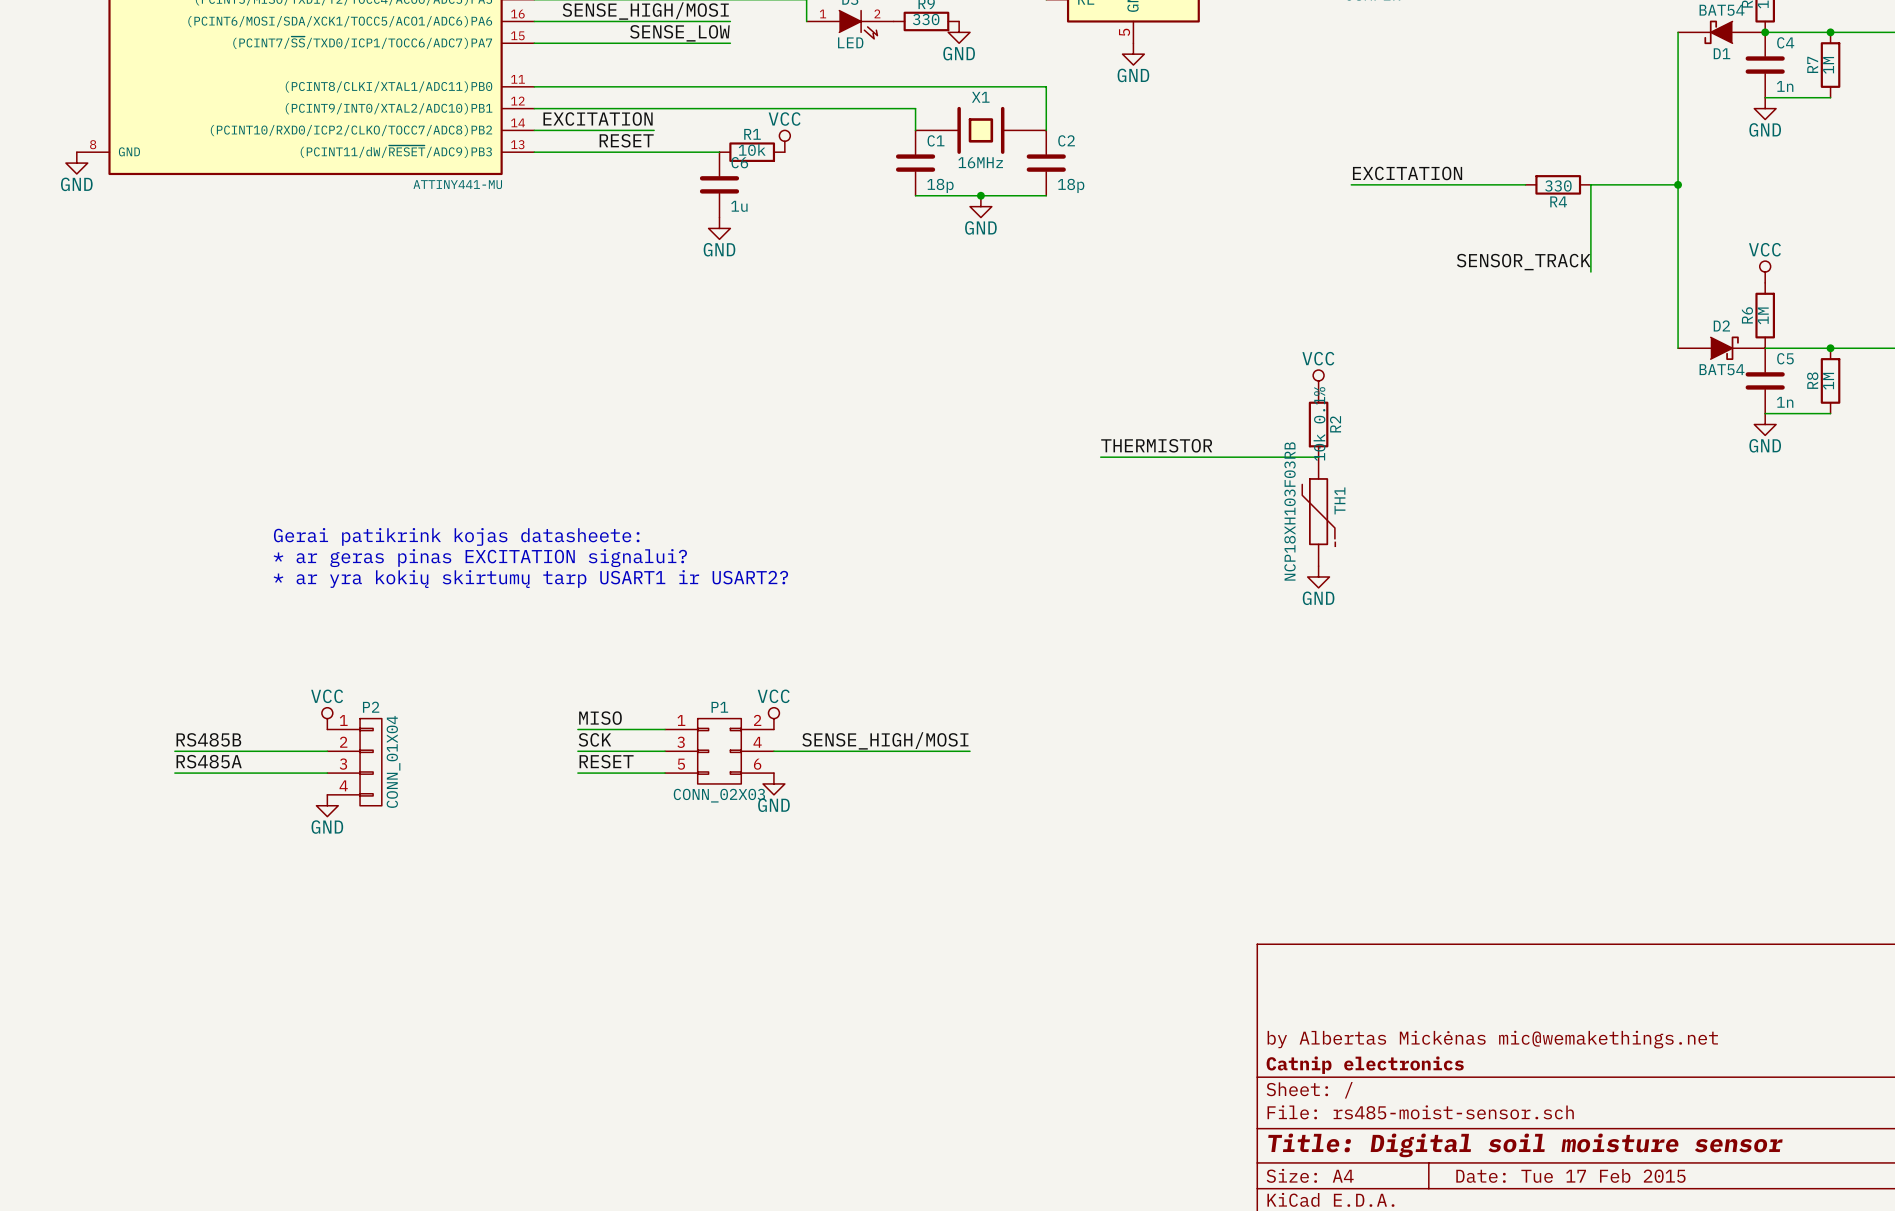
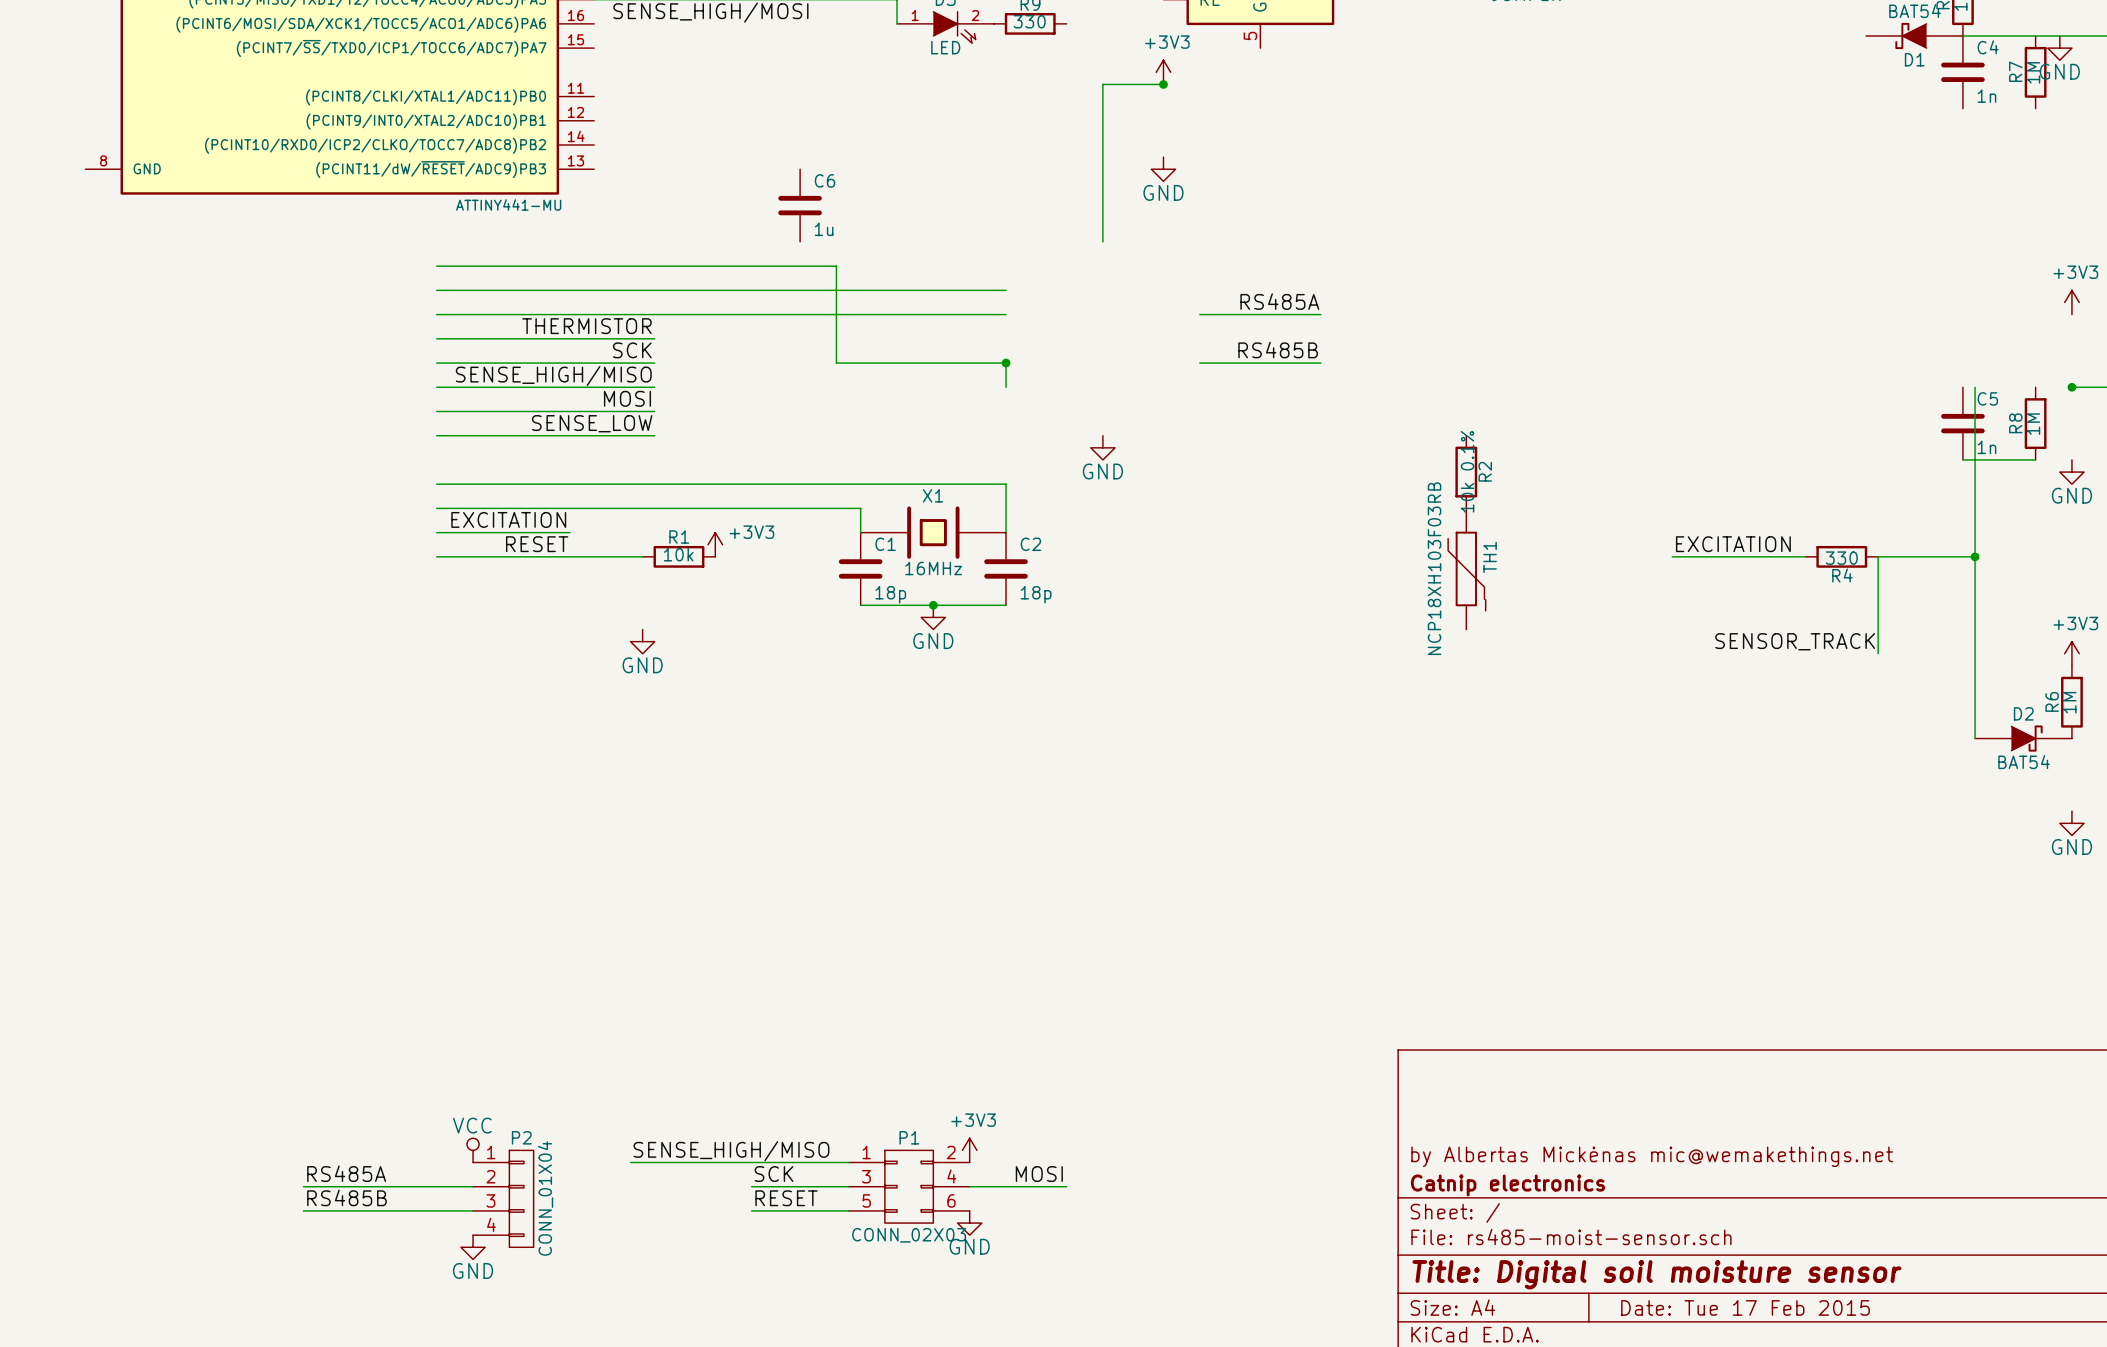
wire: (534, 21) (730, 21) -> none
power symbol: GND (959, 32) -> none
wire: (1678, 32) (1678, 348) -> none
junction: (1765, 32) -> none
junction: (1830, 32) -> none
label: SENSE_LOW (679, 33) -> none
wire: (534, 43) (730, 43) -> none
power symbol: GND (1133, 54) -> none
power symbol: none -> +3V3 (1163, 72)
wire: none -> (1163, 84) (1102, 84) (1102, 241)
junction: none -> (1163, 84)
wire: (534, 86) (1046, 86) (1046, 130) -> none
wire: (1765, 97) (1830, 97) -> none
wire: (534, 108) (915, 108) (915, 130) -> none
power symbol position: GND (1765, 108) -> GND (2059, 48)
label: EXCITATION (598, 118) -> none
wire: (534, 130) (654, 130) -> none
X1 position: (980, 130) -> (933, 532)
label: RESET (626, 140) -> none
power symbol: VCC (784, 141) -> none
wire: (534, 152) (719, 152) -> none
R1 position: (752, 152) -> (678, 556)
power symbol: none -> GND (1163, 169)
power symbol: GND (76, 163) -> none
C1 position: (915, 163) -> (860, 568)
C2 position: (1046, 163) -> (1006, 568)
label: EXCITATION (1407, 173) -> none
wire: (1351, 184) (1525, 184) -> none
R4 position: (1558, 184) -> (1841, 556)
wire: (1678, 184) (1590, 184) (1590, 272) -> none
junction: (1678, 184) -> none
wire: (915, 195) (1046, 195) -> none
junction: (980, 195) -> none
power symbol: GND (980, 206) -> none
power symbol: GND (719, 228) -> none
wire: none -> (436, 266) (836, 266) (836, 363) (1006, 363) (1006, 387)
wire: none -> (436, 290) (1006, 290)
label: SENSOR_TRACK (1523, 262) -> none
label: none -> RS485A (1279, 301)
power symbol: VCC (1765, 272) -> none
power symbol: none -> +3V3 (2071, 302)
wire: none -> (436, 314) (1006, 314)
wire: none -> (1199, 314) (1320, 314)
label: none -> THERMISTOR (586, 326)
wire: none -> (436, 338) (654, 338)
label: none -> SCK (632, 350)
label: none -> RS485B (1278, 350)
R6 position: (1765, 315) -> (2071, 702)
wire: none -> (436, 363) (654, 363)
junction: none -> (1006, 363)
wire: none -> (1199, 363) (1320, 363)
label: none -> SENSE_HIGH/MISO (553, 375)
wire: none -> (436, 387) (654, 387)
D2 position: (1721, 348) -> (2023, 738)
wire: (1765, 348) (1863, 348) -> none
wire: none -> (1975, 387) (1975, 738)
junction position: (1830, 348) -> (2071, 387)
label: none -> MOSI (627, 398)
wire: none -> (436, 411) (654, 411)
power symbol: VCC (1318, 380) -> none
label: none -> SENSE_LOW (592, 423)
wire: none -> (436, 435) (654, 435)
power symbol: none -> GND (1102, 447)
power symbol position: GND (1765, 424) -> GND (2071, 472)
wire: none -> (436, 484) (1006, 484) (1006, 532)
label: THERMISTOR (1156, 445) -> none
wire: none -> (436, 508) (860, 508) (860, 532)
wire: (1100, 457) (1318, 457) -> none
label: none -> EXCITATION (508, 519)
wire: none -> (436, 532) (569, 532)
label: none -> RESET (537, 544)
power symbol: none -> +3V3 (715, 544)
label: none -> EXCITATION (1733, 544)
wire: none -> (436, 556) (642, 556)
wire: none -> (1672, 556) (1805, 556)
wire: none -> (1975, 556) (1878, 556) (1878, 653)
junction: none -> (1975, 556)
text: Gerai patikrink kojas datasheete: (456, 536) -> none
wire: none -> (860, 605) (1006, 605)
junction: none -> (933, 605)
power symbol: none -> GND (933, 617)
text: * ar geras pinas EXCITATION signalui? (480, 558) -> none
power symbol: none -> GND (642, 641)
power symbol: GND (1318, 577) -> none
label: none -> SENSOR_TRACK (1795, 641)
text: * ar yra kokių skirtumų tarp USART1 ir USART2? (530, 579) -> none
power symbol: none -> +3V3 (2071, 653)
power symbol: VCC (327, 718) -> none
label: MISO (600, 718) -> none
power symbol: VCC (773, 718) -> none
wire: (577, 729) (665, 729) -> none
label: RS485B (208, 739) -> none
label: SCK (594, 739) -> none
label: SENSE_HIGH/MOSI (885, 740) -> none
power symbol: none -> GND (2071, 823)
wire: (174, 751) (327, 751) -> none
wire: (577, 751) (665, 751) -> none
P1 position: (719, 751) -> (909, 1186)
wire: (773, 751) (970, 751) -> none
label: RS485A (209, 761) -> none
label: RESET (606, 761) -> none
P2 position: (354, 762) -> (503, 1198)
wire: (174, 773) (327, 773) -> none
wire: (577, 773) (665, 773) -> none
power symbol: GND (773, 783) -> none
power symbol: GND (327, 805) -> none
power symbol: none -> VCC (473, 1150)
label: none -> SENSE_HIGH/MISO (731, 1151)
power symbol: none -> +3V3 (969, 1150)
wire: none -> (630, 1162) (848, 1162)
label: none -> RS485A (346, 1173)
label: none -> SCK (774, 1174)
label: none -> MOSI (1039, 1174)
wire: none -> (303, 1186) (473, 1186)
wire: none -> (751, 1186) (848, 1186)
wire: none -> (969, 1186) (1066, 1186)
label: none -> RS485B (346, 1197)
label: none -> RESET (786, 1198)
wire: none -> (303, 1210) (473, 1210)
wire: none -> (751, 1210) (848, 1210)
power symbol: none -> GND (969, 1223)
power symbol: none -> GND (473, 1247)

